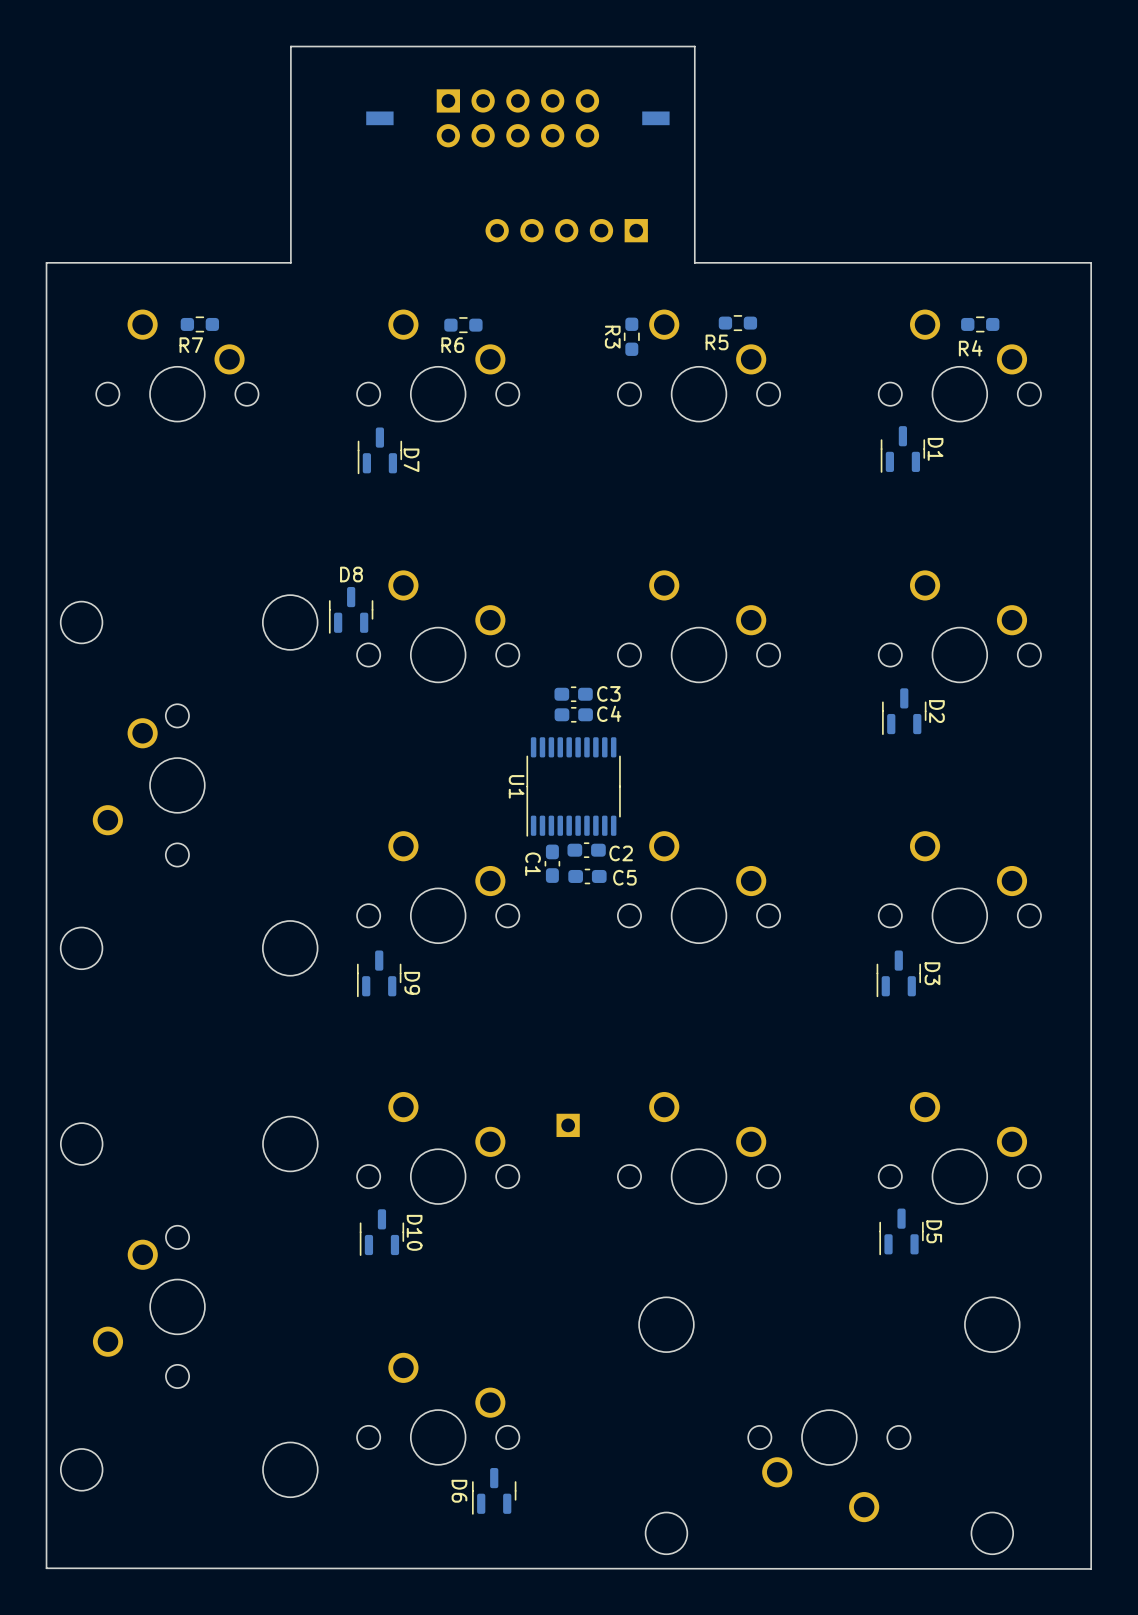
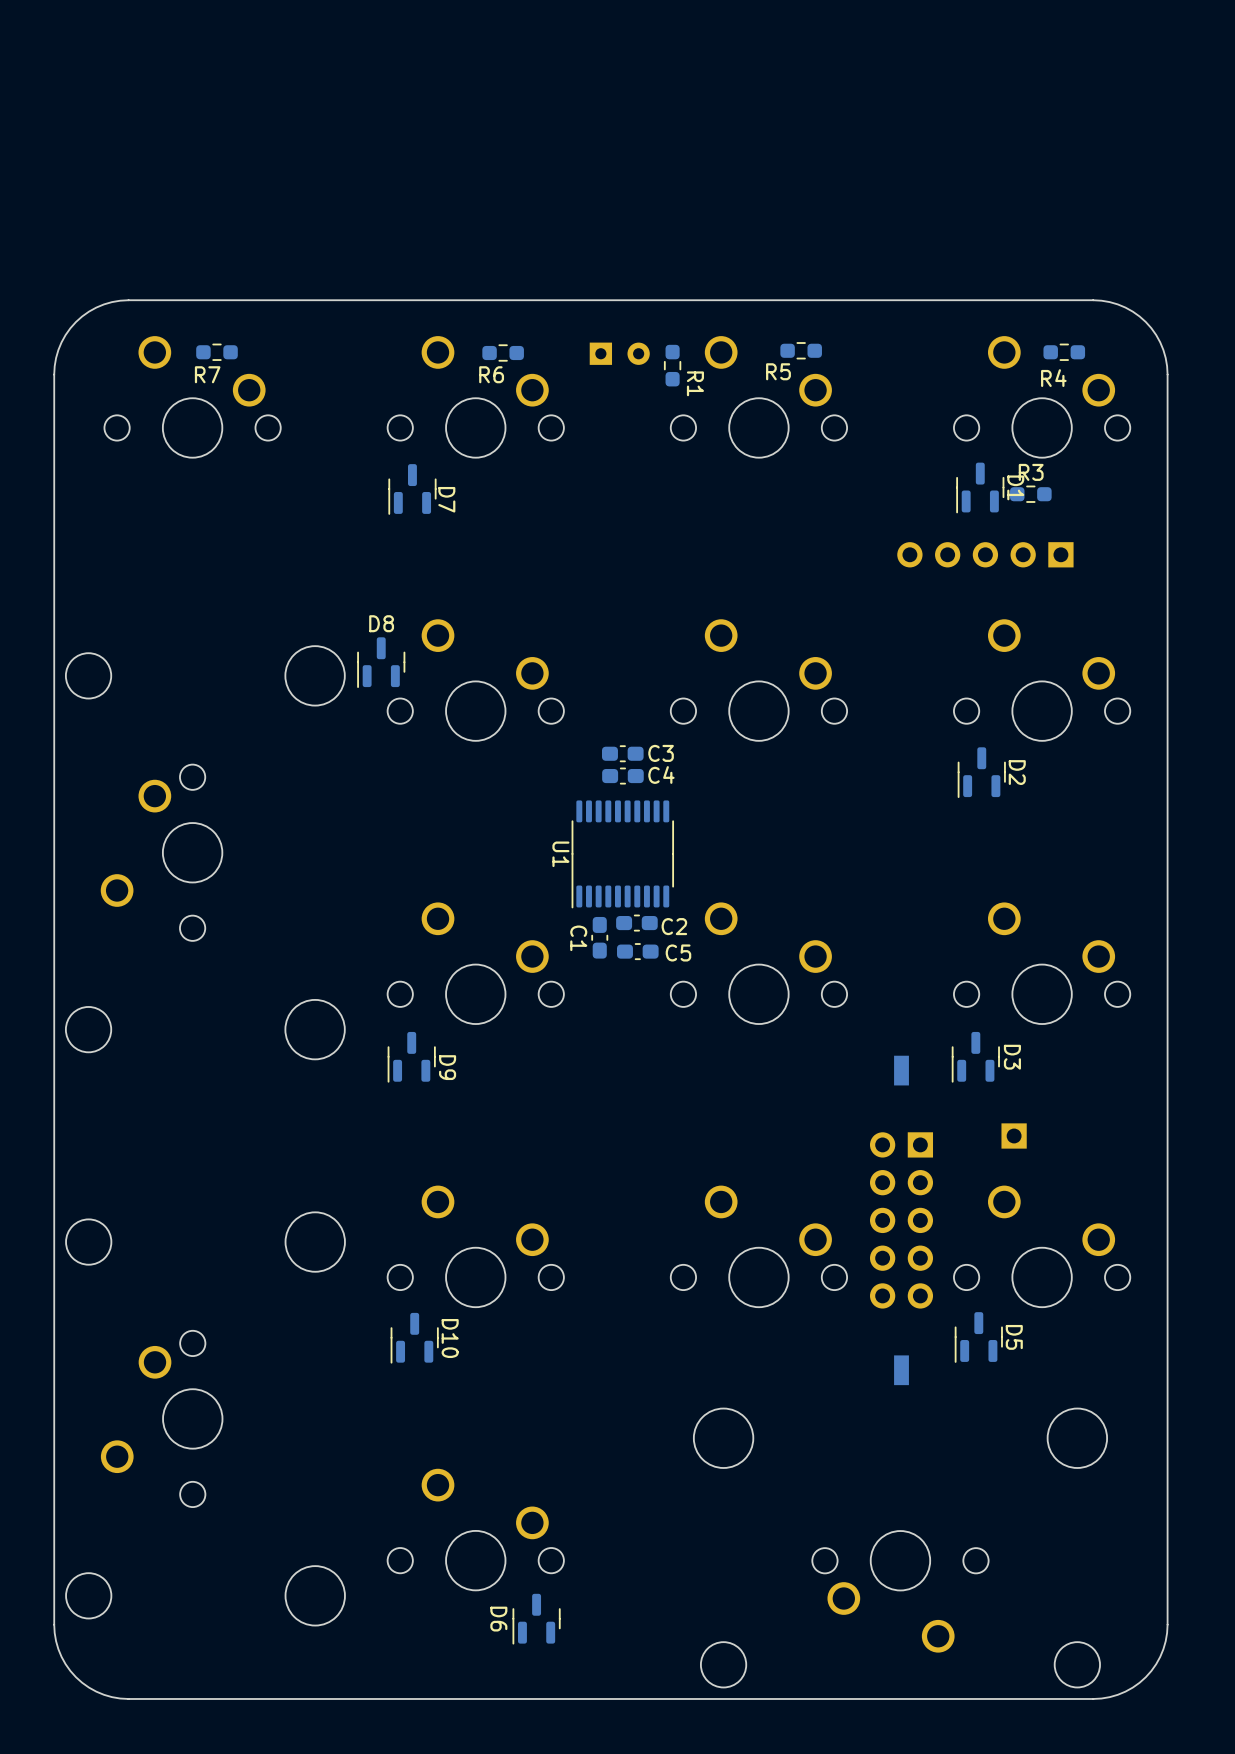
board edge: (694, 46) (694, 262) (1091, 262) (1091, 1568) (46, 1568) (46, 262) (290, 262) (290, 46) (694, 46) -> (1093, 300) (1117, 304) (1132, 311) (1145, 322) (1156, 335) (1163, 350) (1167, 374) (1167, 1624) (1163, 1649) (1151, 1671) (1139, 1682) (1125, 1691) (1109, 1697) (1093, 1698) (128, 1698) (104, 1694) (82, 1682) (70, 1671) (61, 1656) (56, 1641) (54, 1624) (54, 374) (58, 350) (70, 328) (82, 316) (96, 307) (112, 302) (128, 300) (1093, 300)
part: (517, 118) -> none
part: (566, 230) -> none
part: none -> (619, 353)
R1: none -> (672, 365)
R3 rotation: 0° (631, 336) -> 90° clockwise (1030, 494)
R3 position: (631, 336) -> (1030, 494)
part: none -> (985, 554)
part: none -> (1014, 1135)
part: none -> (901, 1220)
part: (568, 1125) -> none

